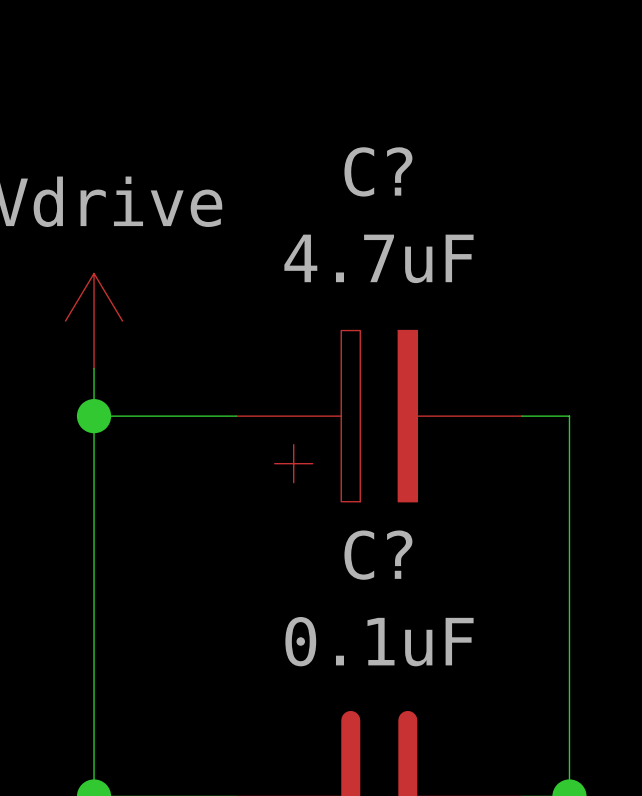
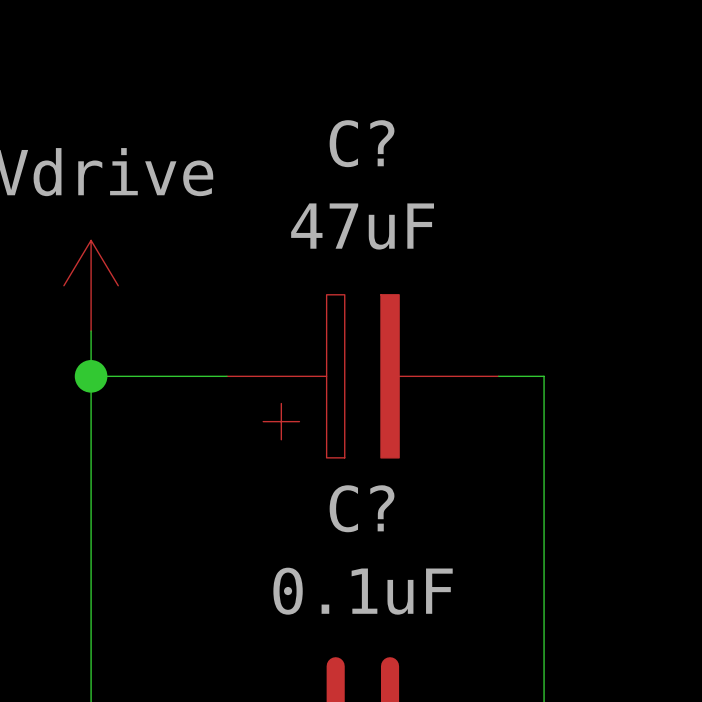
C? value: 4.7uF (378, 258) -> 47uF (362, 226)

